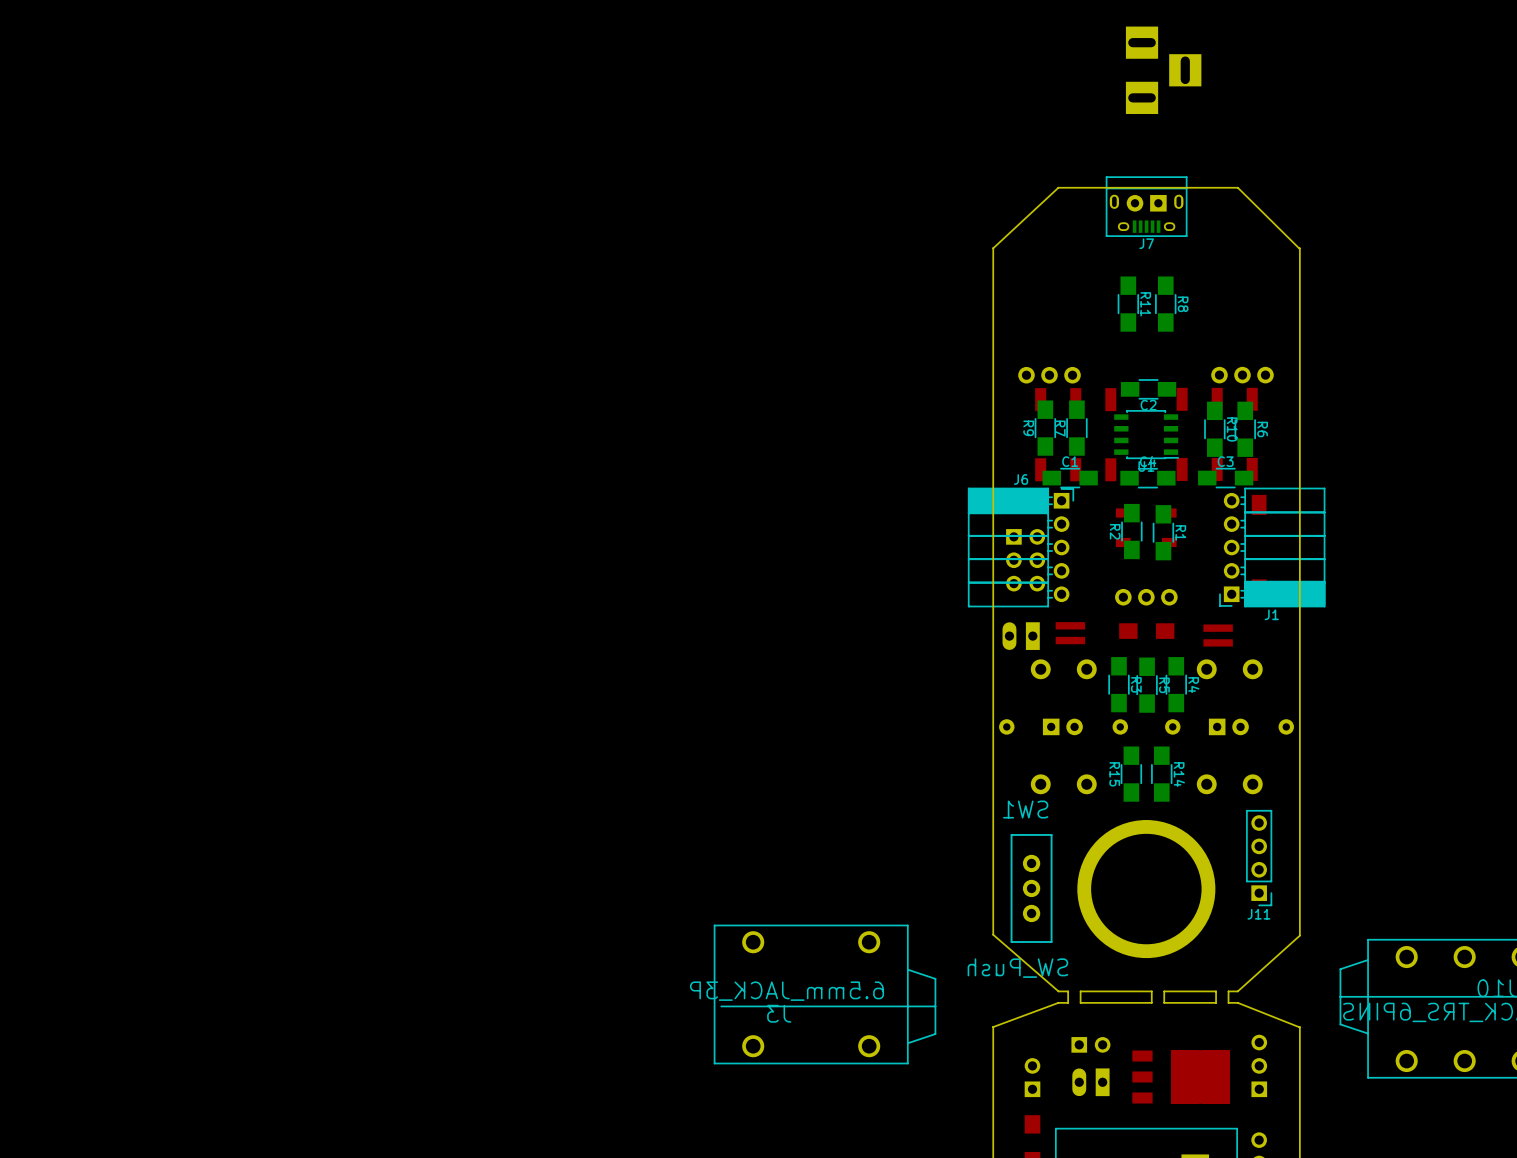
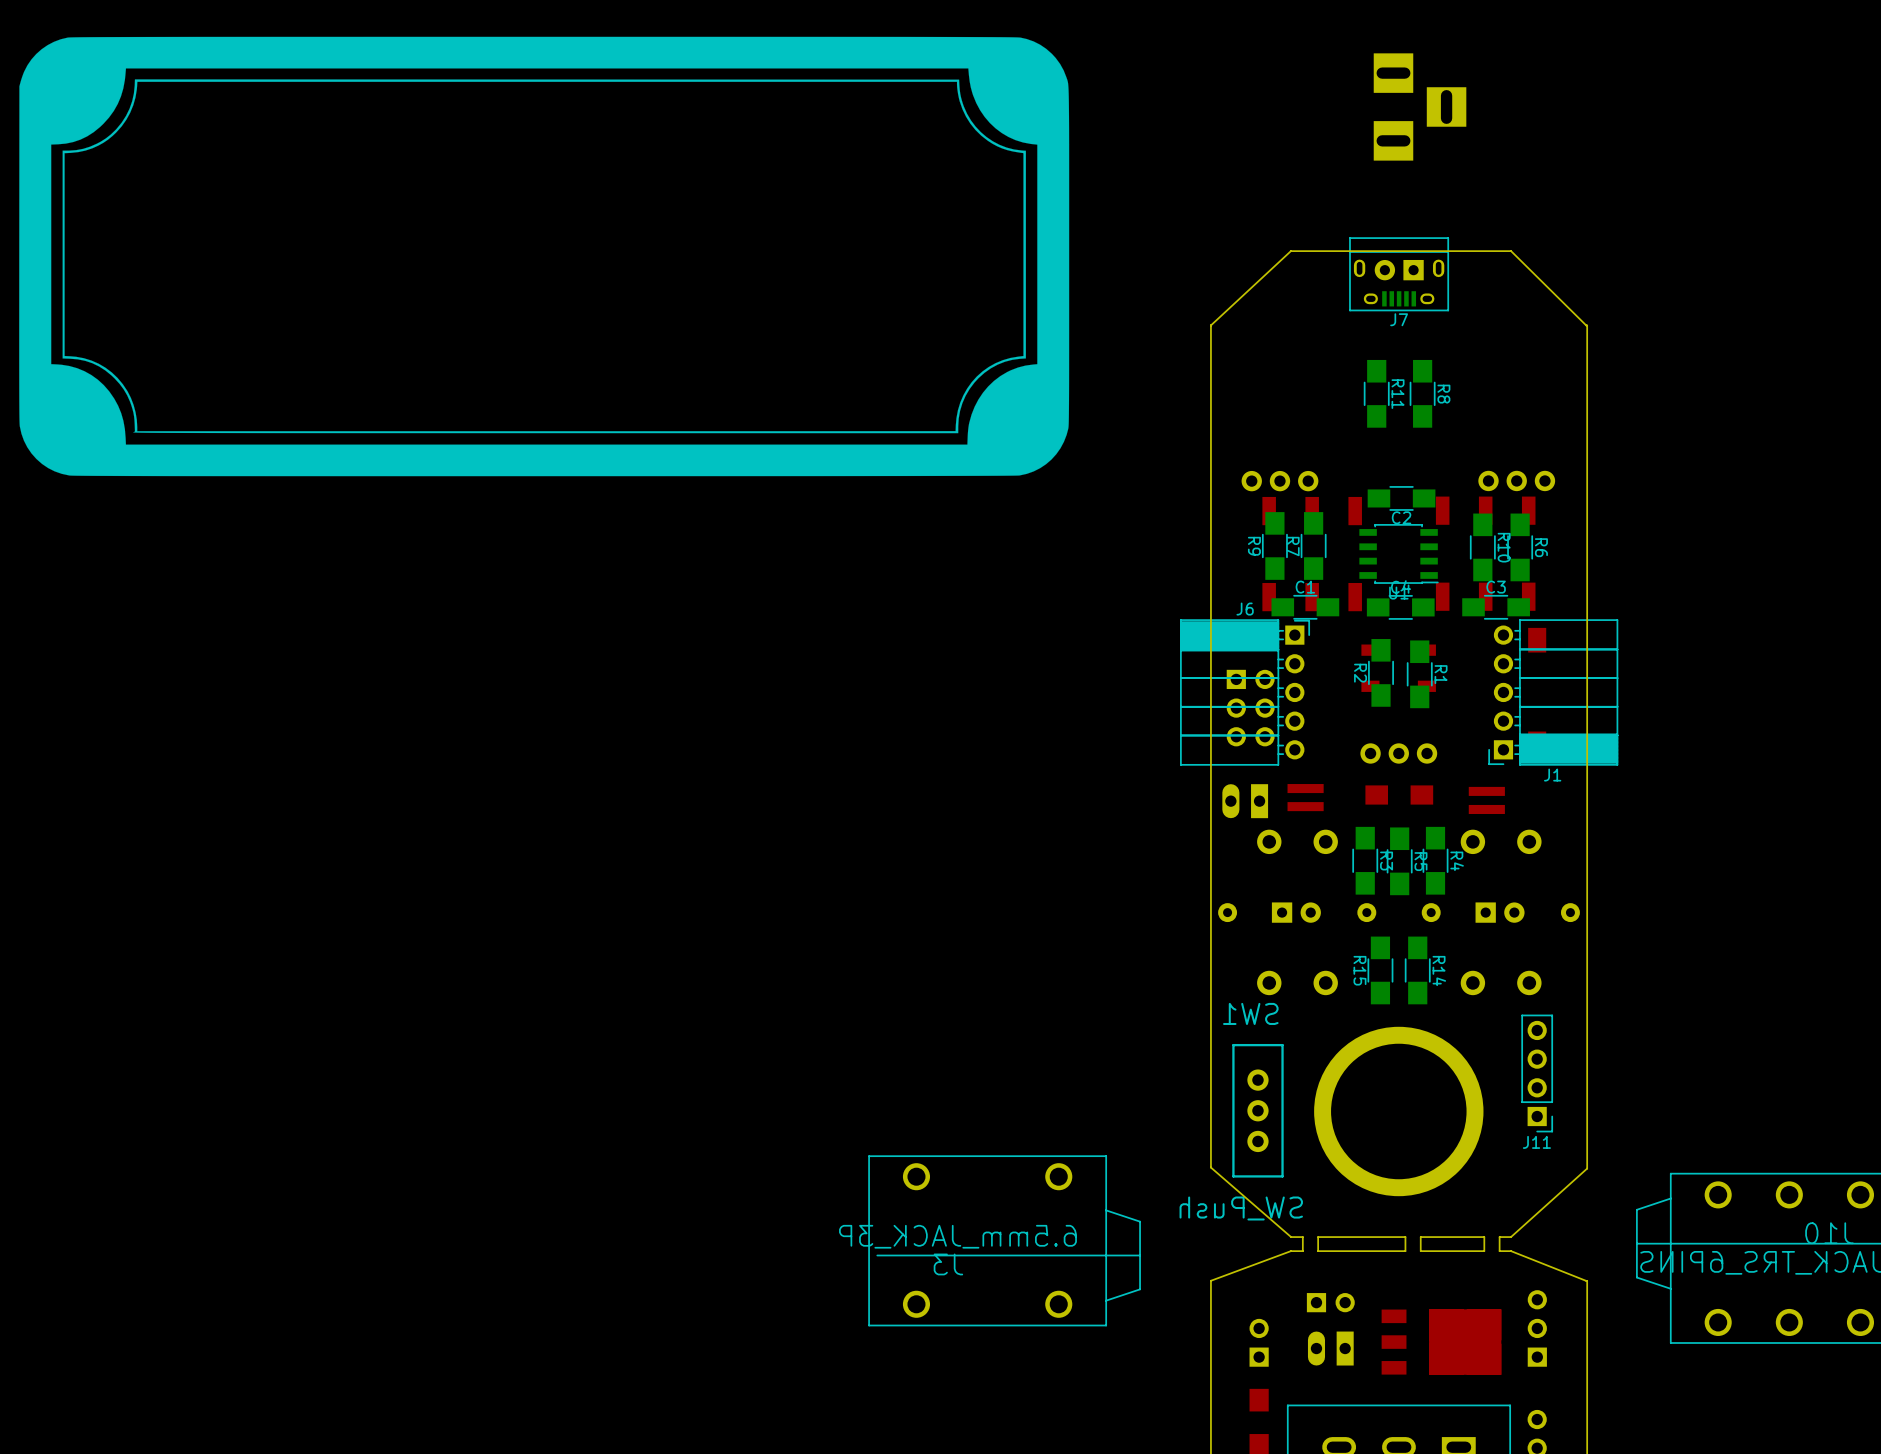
drawing: none -> [19, 36, 1070, 477]

